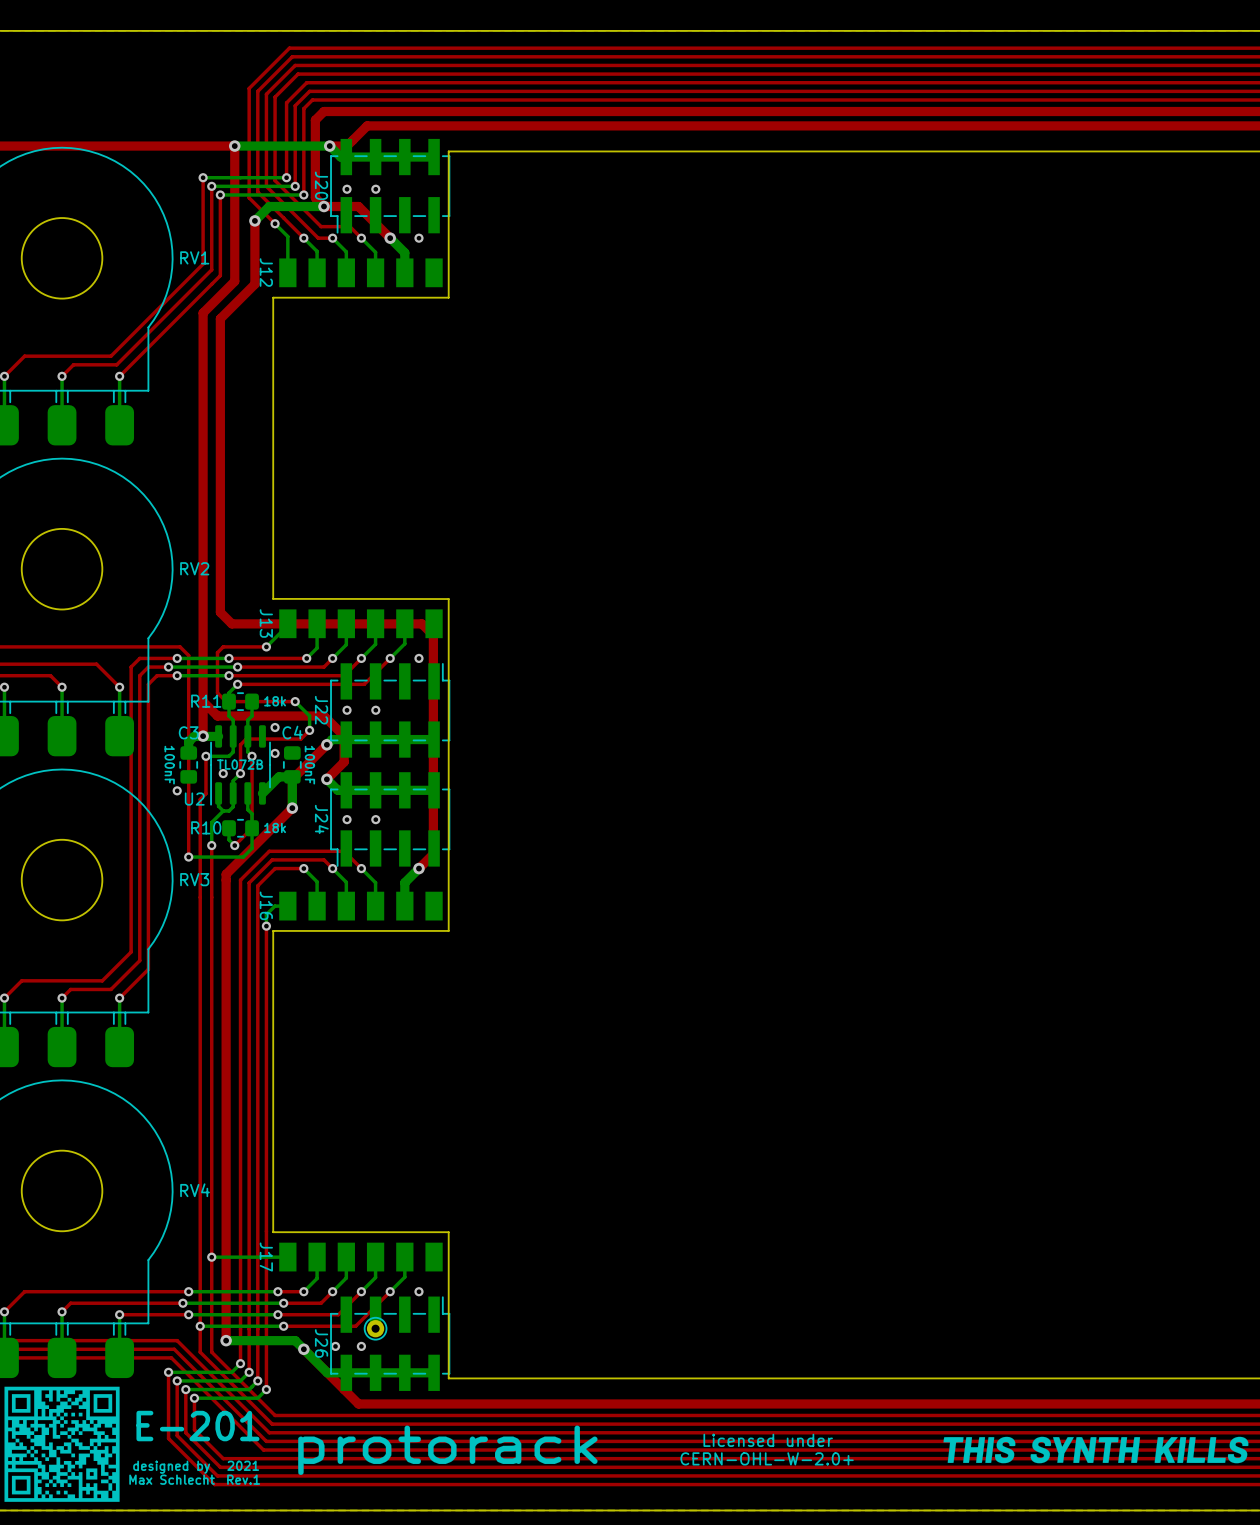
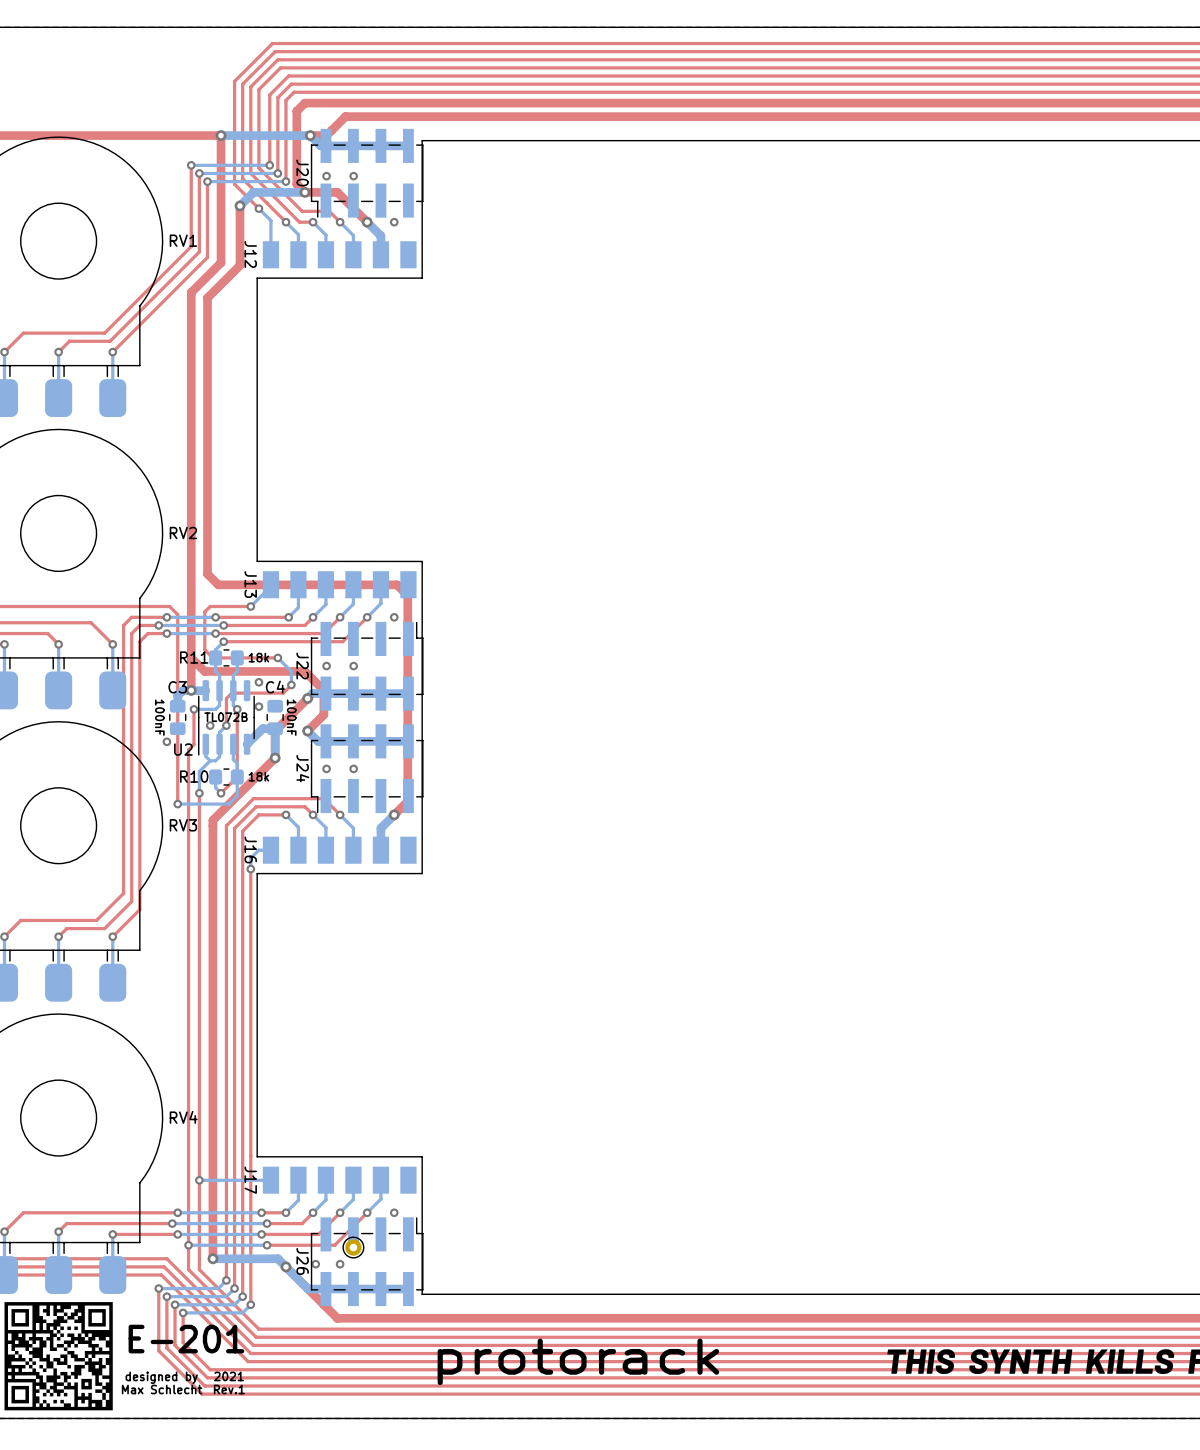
text: Licensed under (768, 1440) -> none
drawing position: (447, 1450) -> (578, 1361)
text: CERN-OHL-W-2.0+ (767, 1458) -> none

